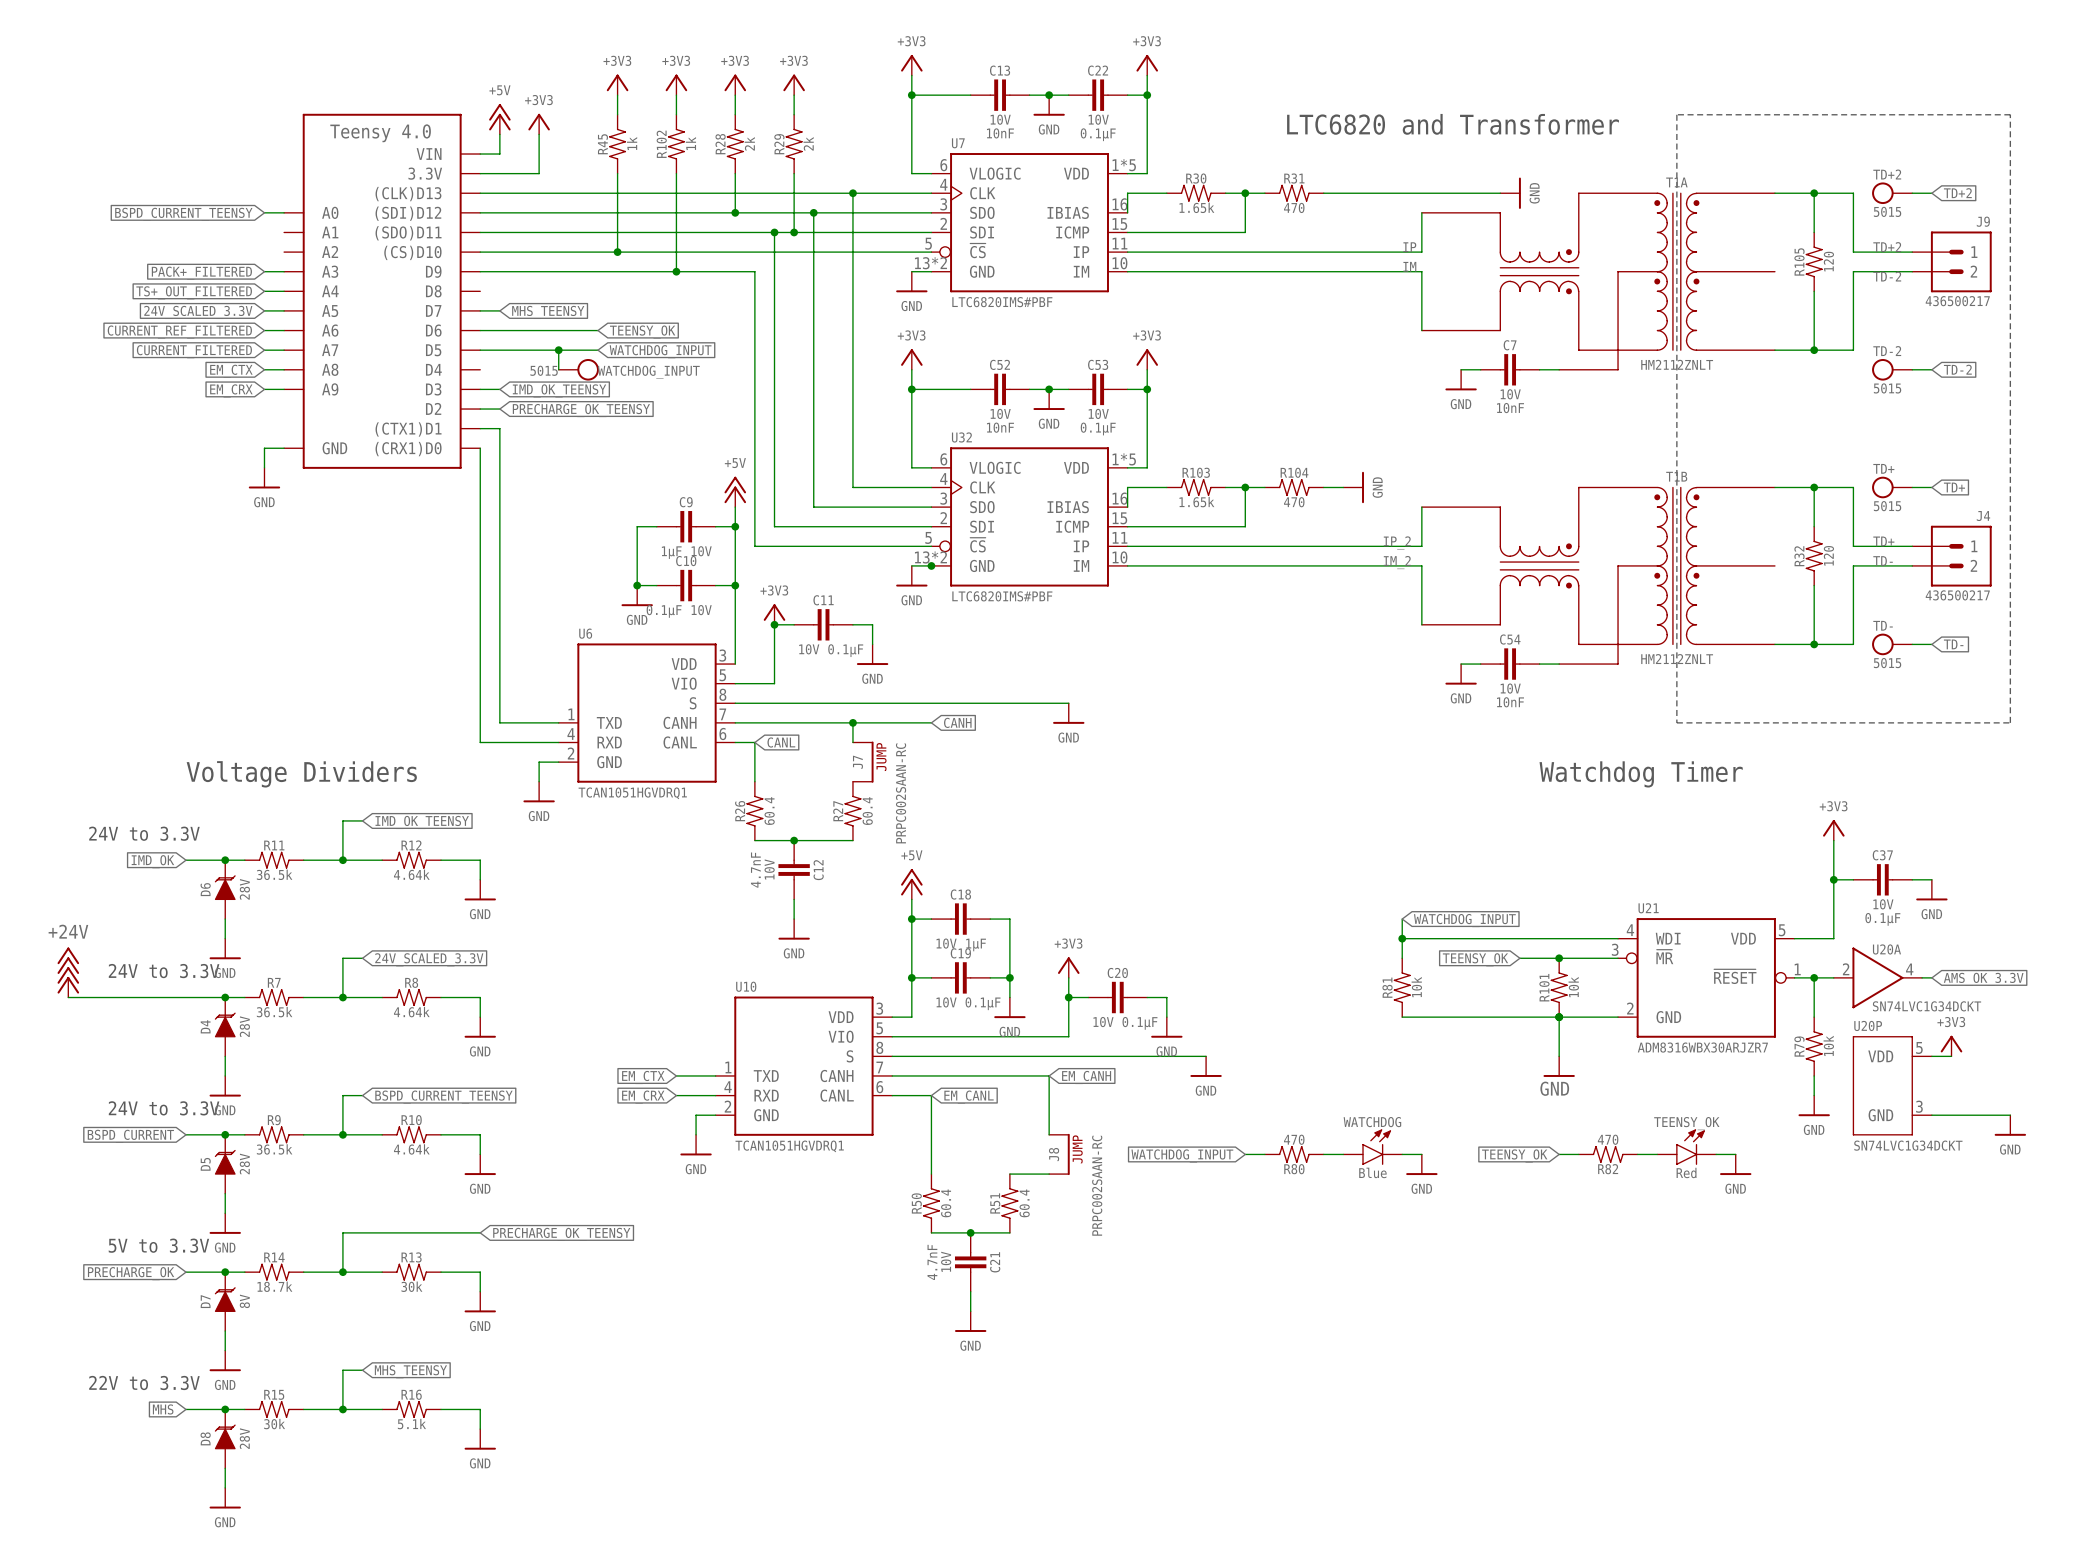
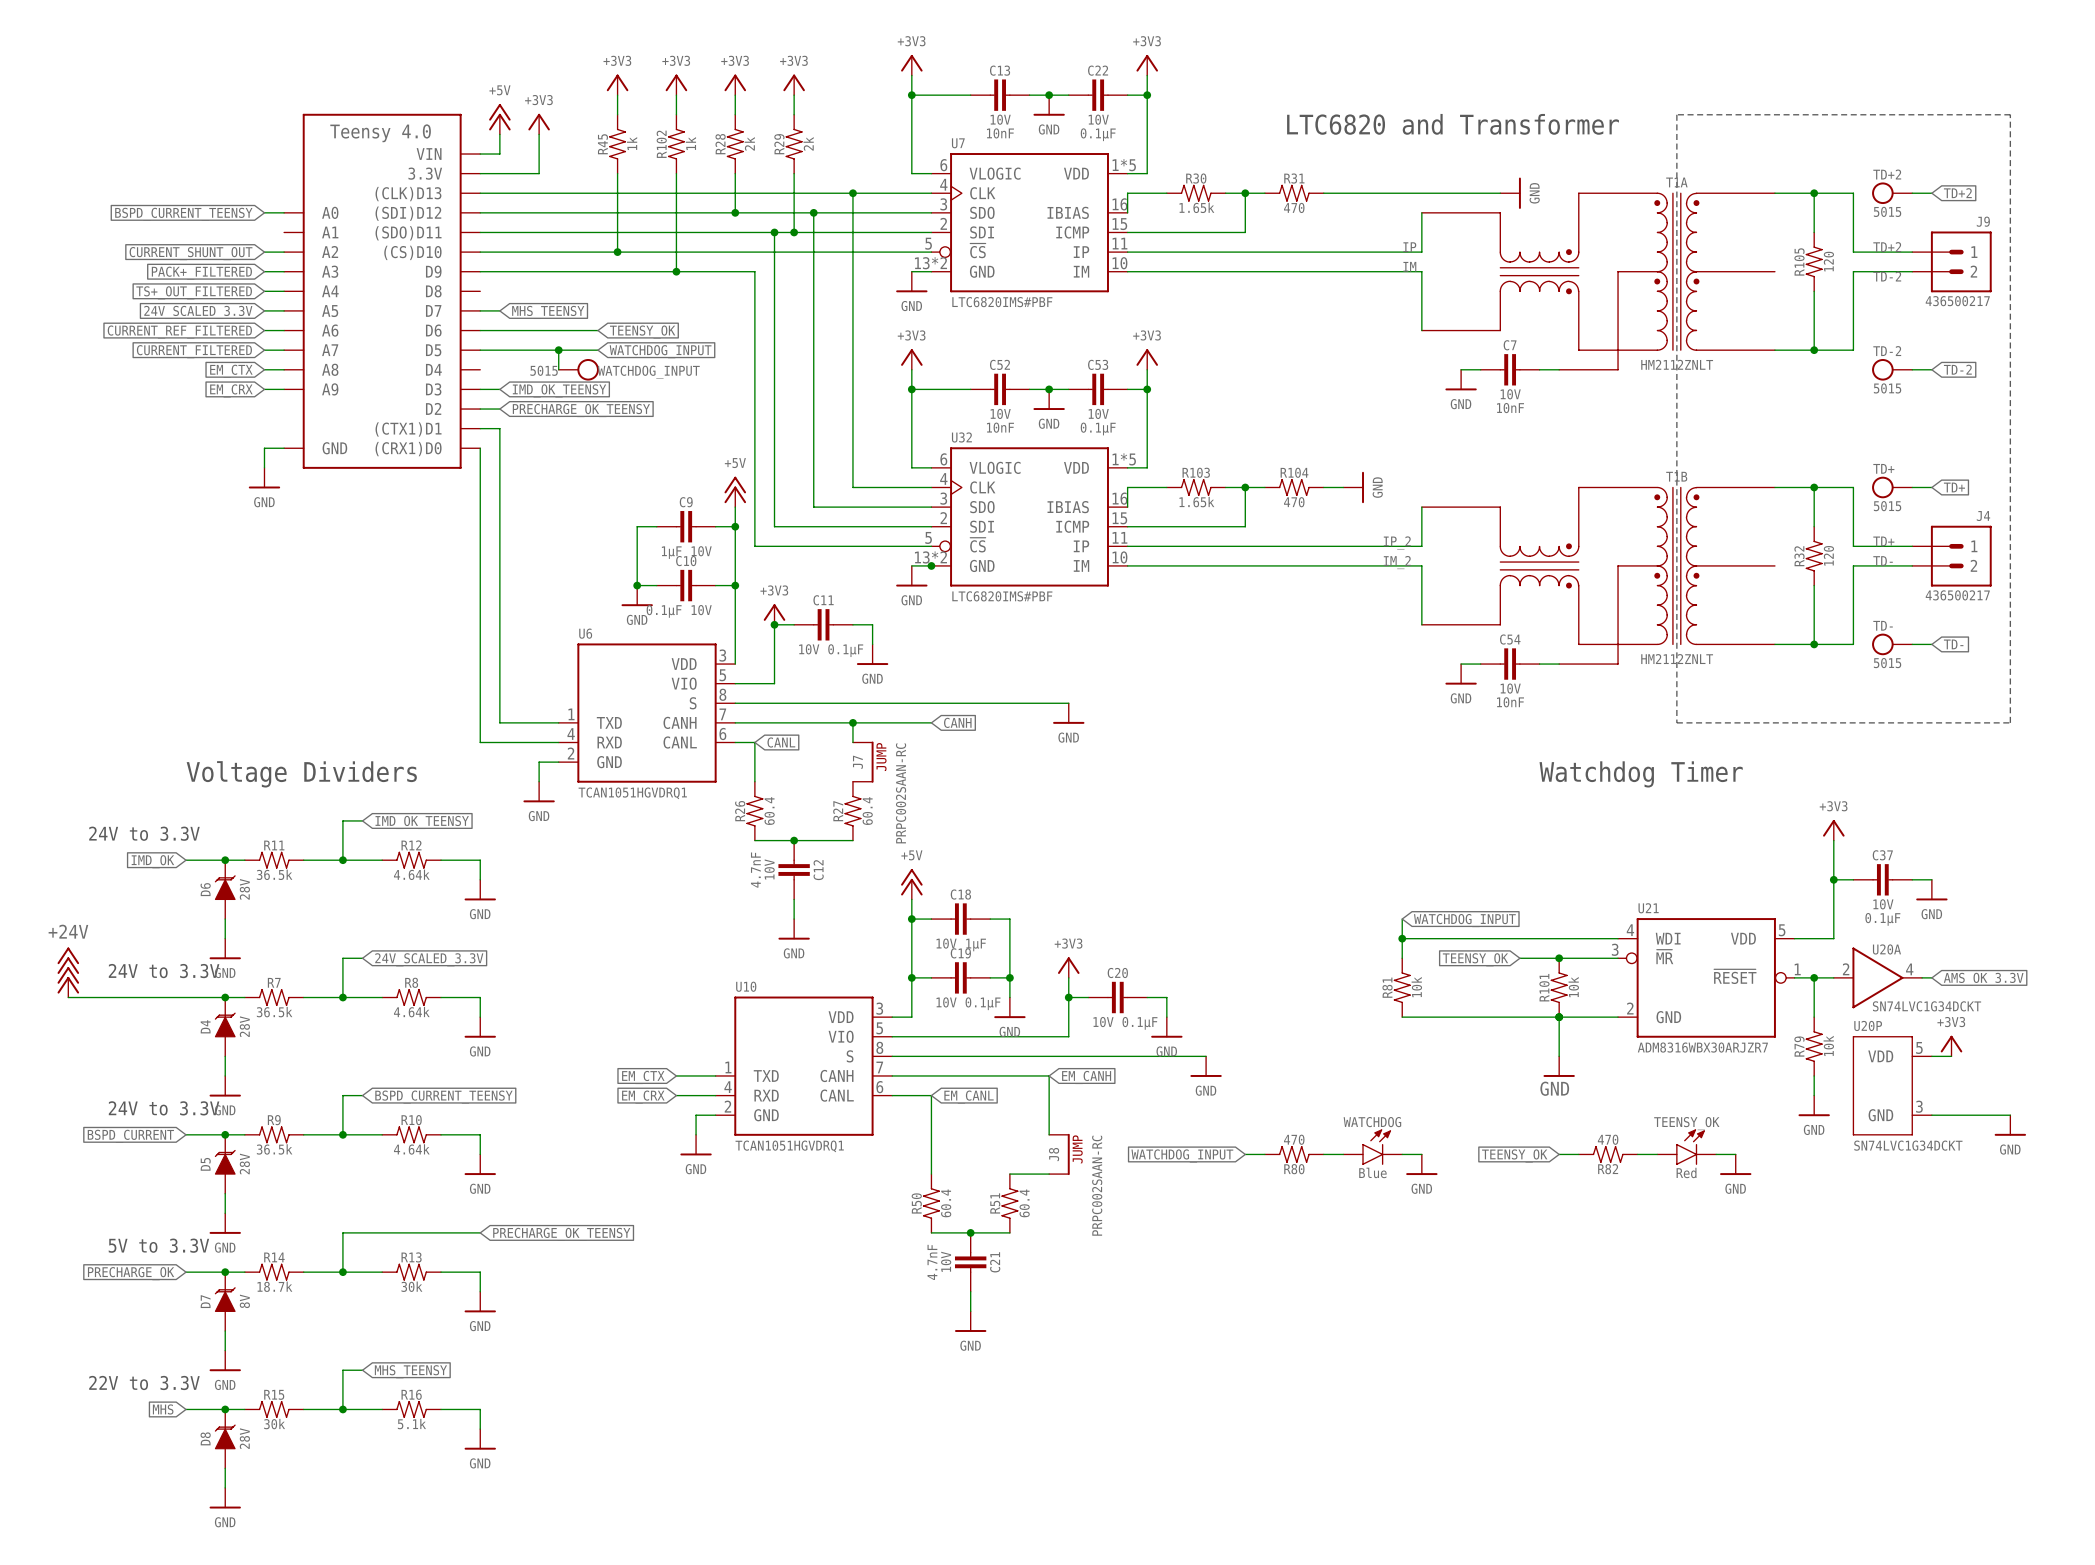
wire: none -> (264, 252) (284, 252)
global label: none -> CURRENT_SHUNT_OUT (191, 253)

